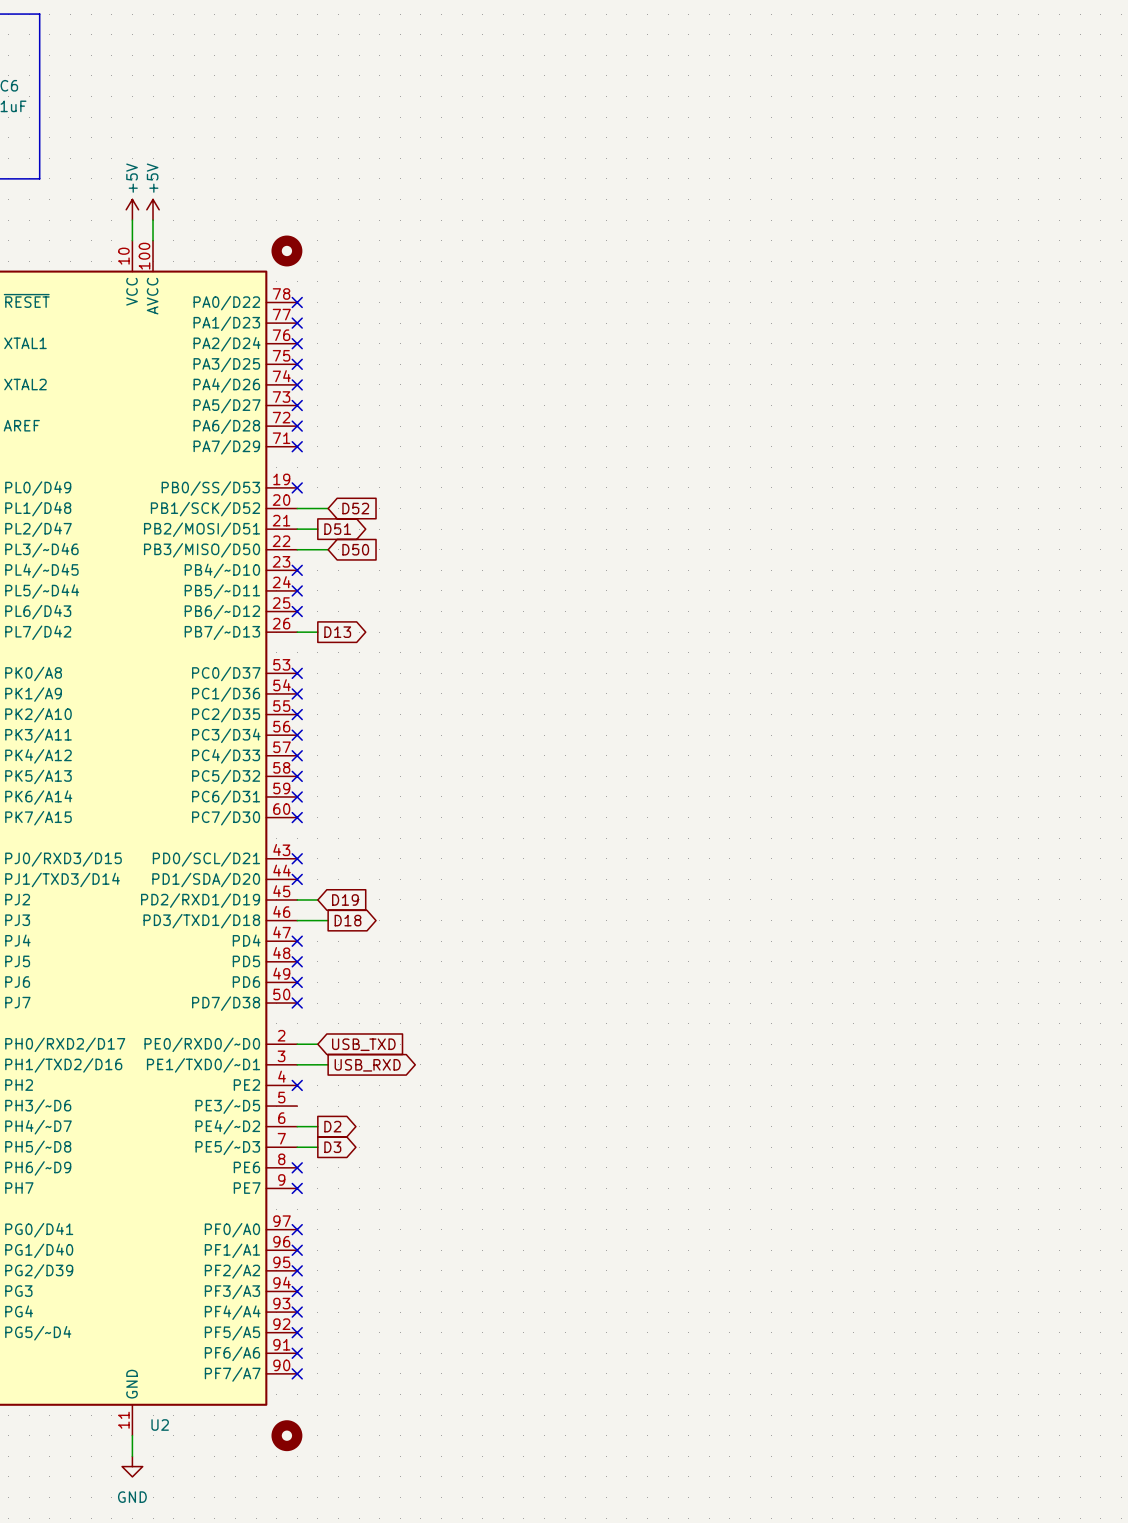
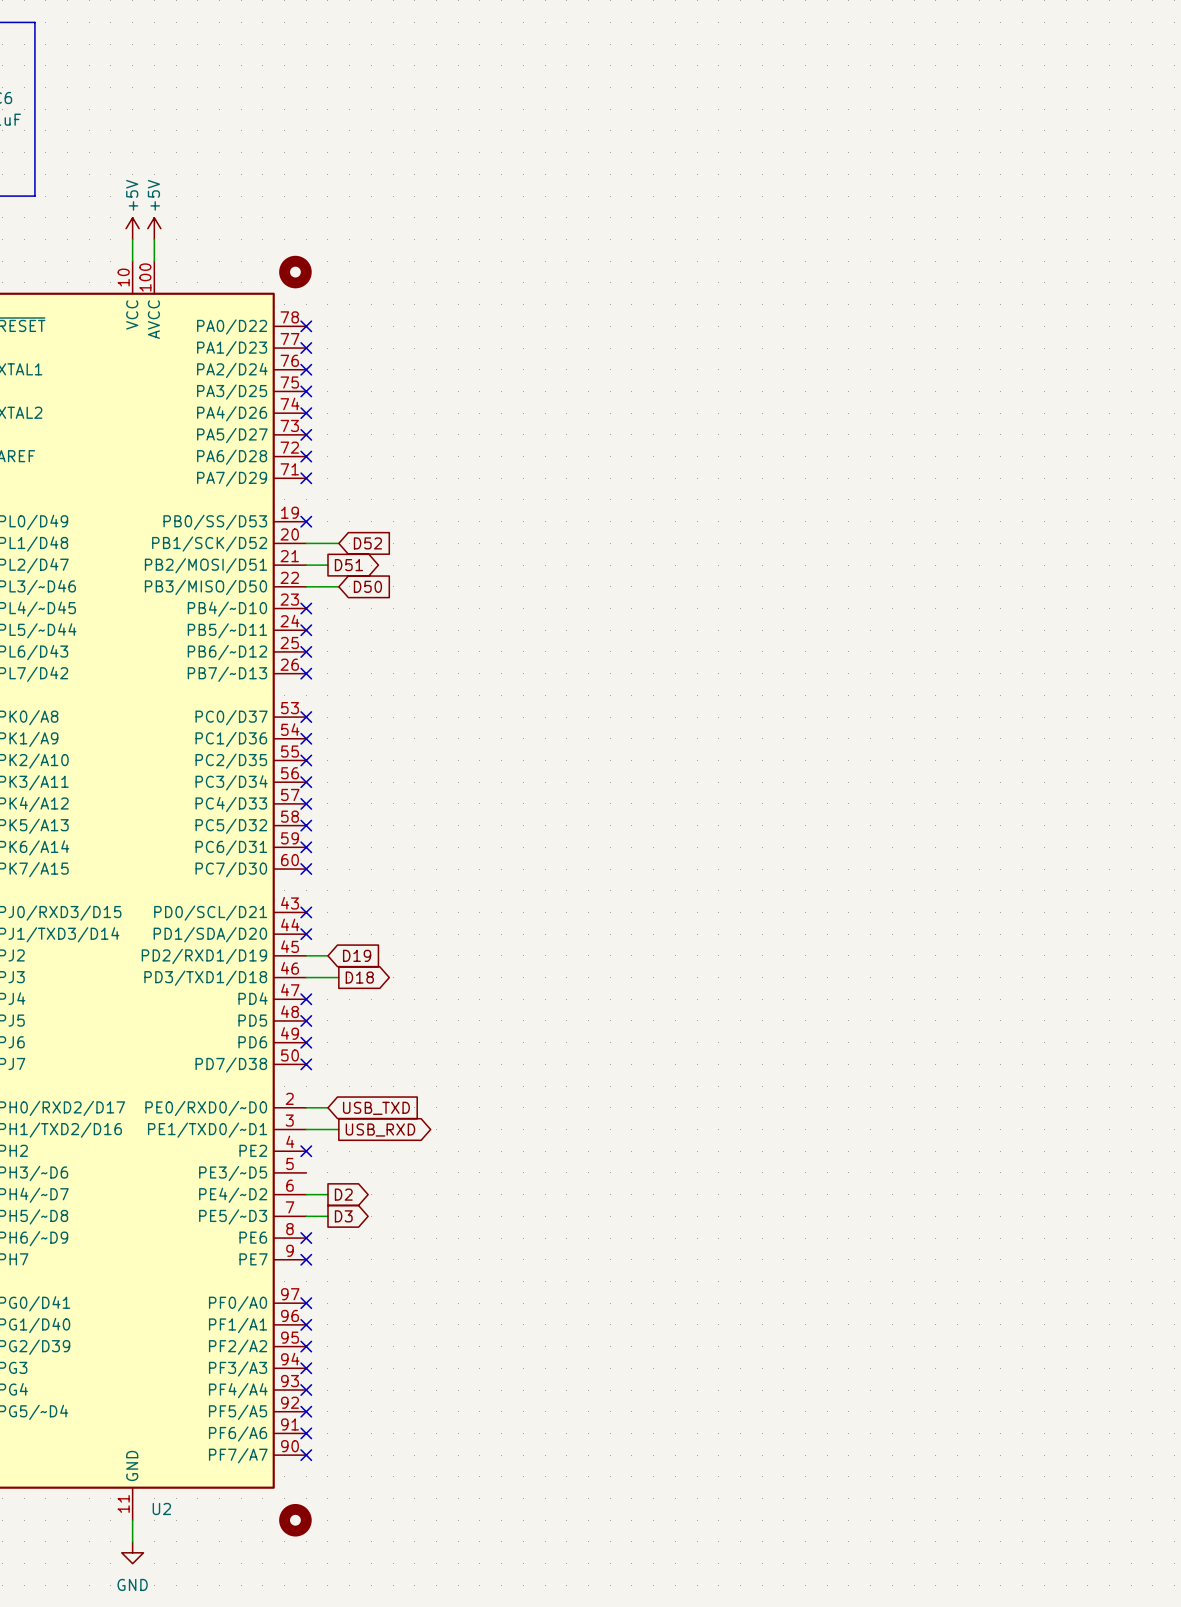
wire: (297, 632) (317, 632) -> none
no-connect mark: none -> (306, 673)
global label: D13 (337, 632) -> none

